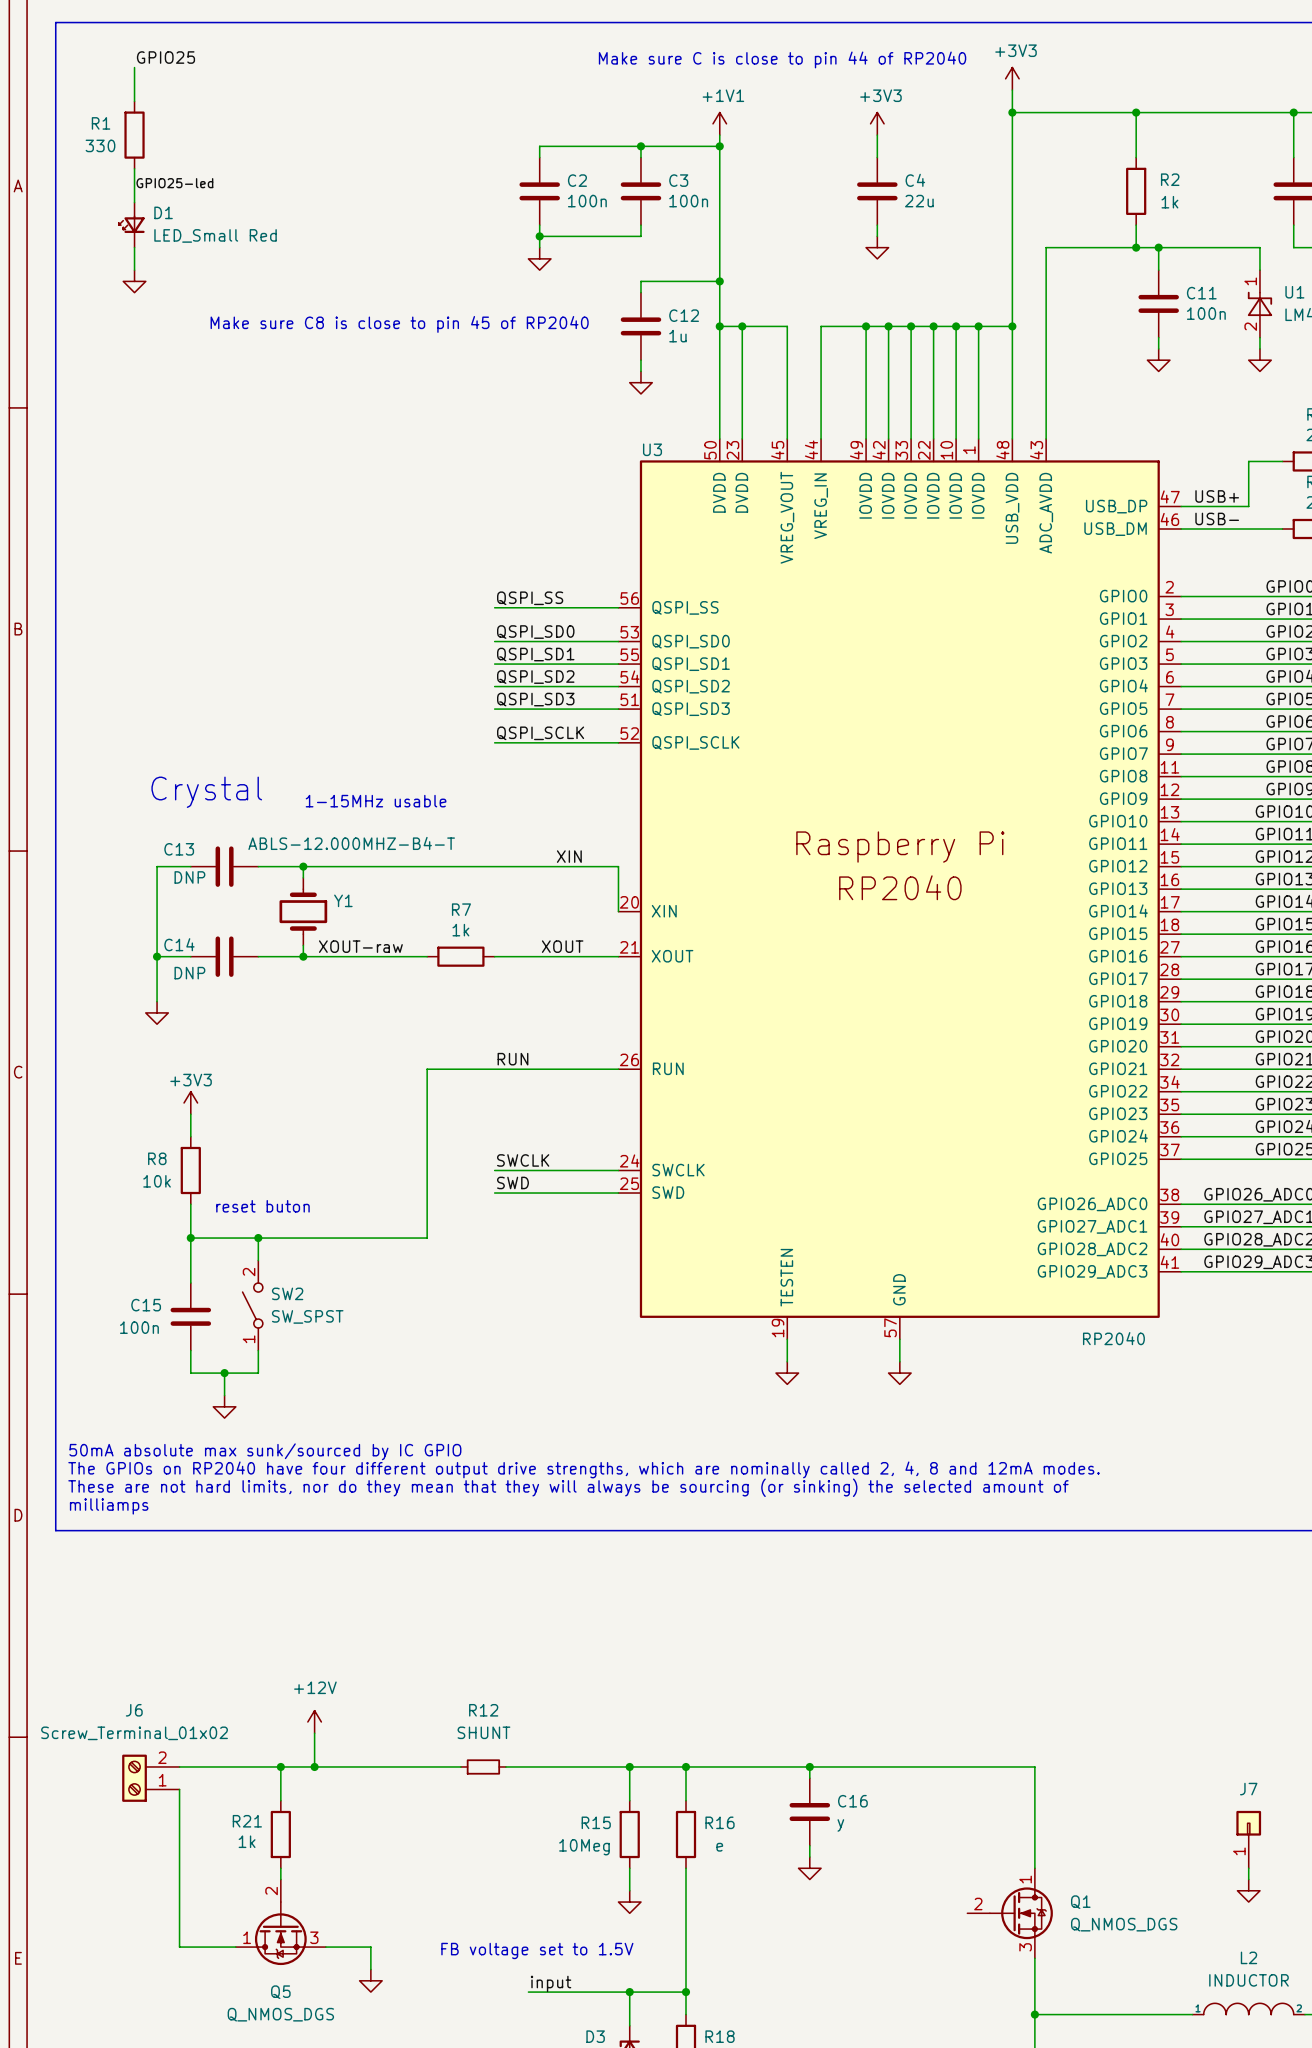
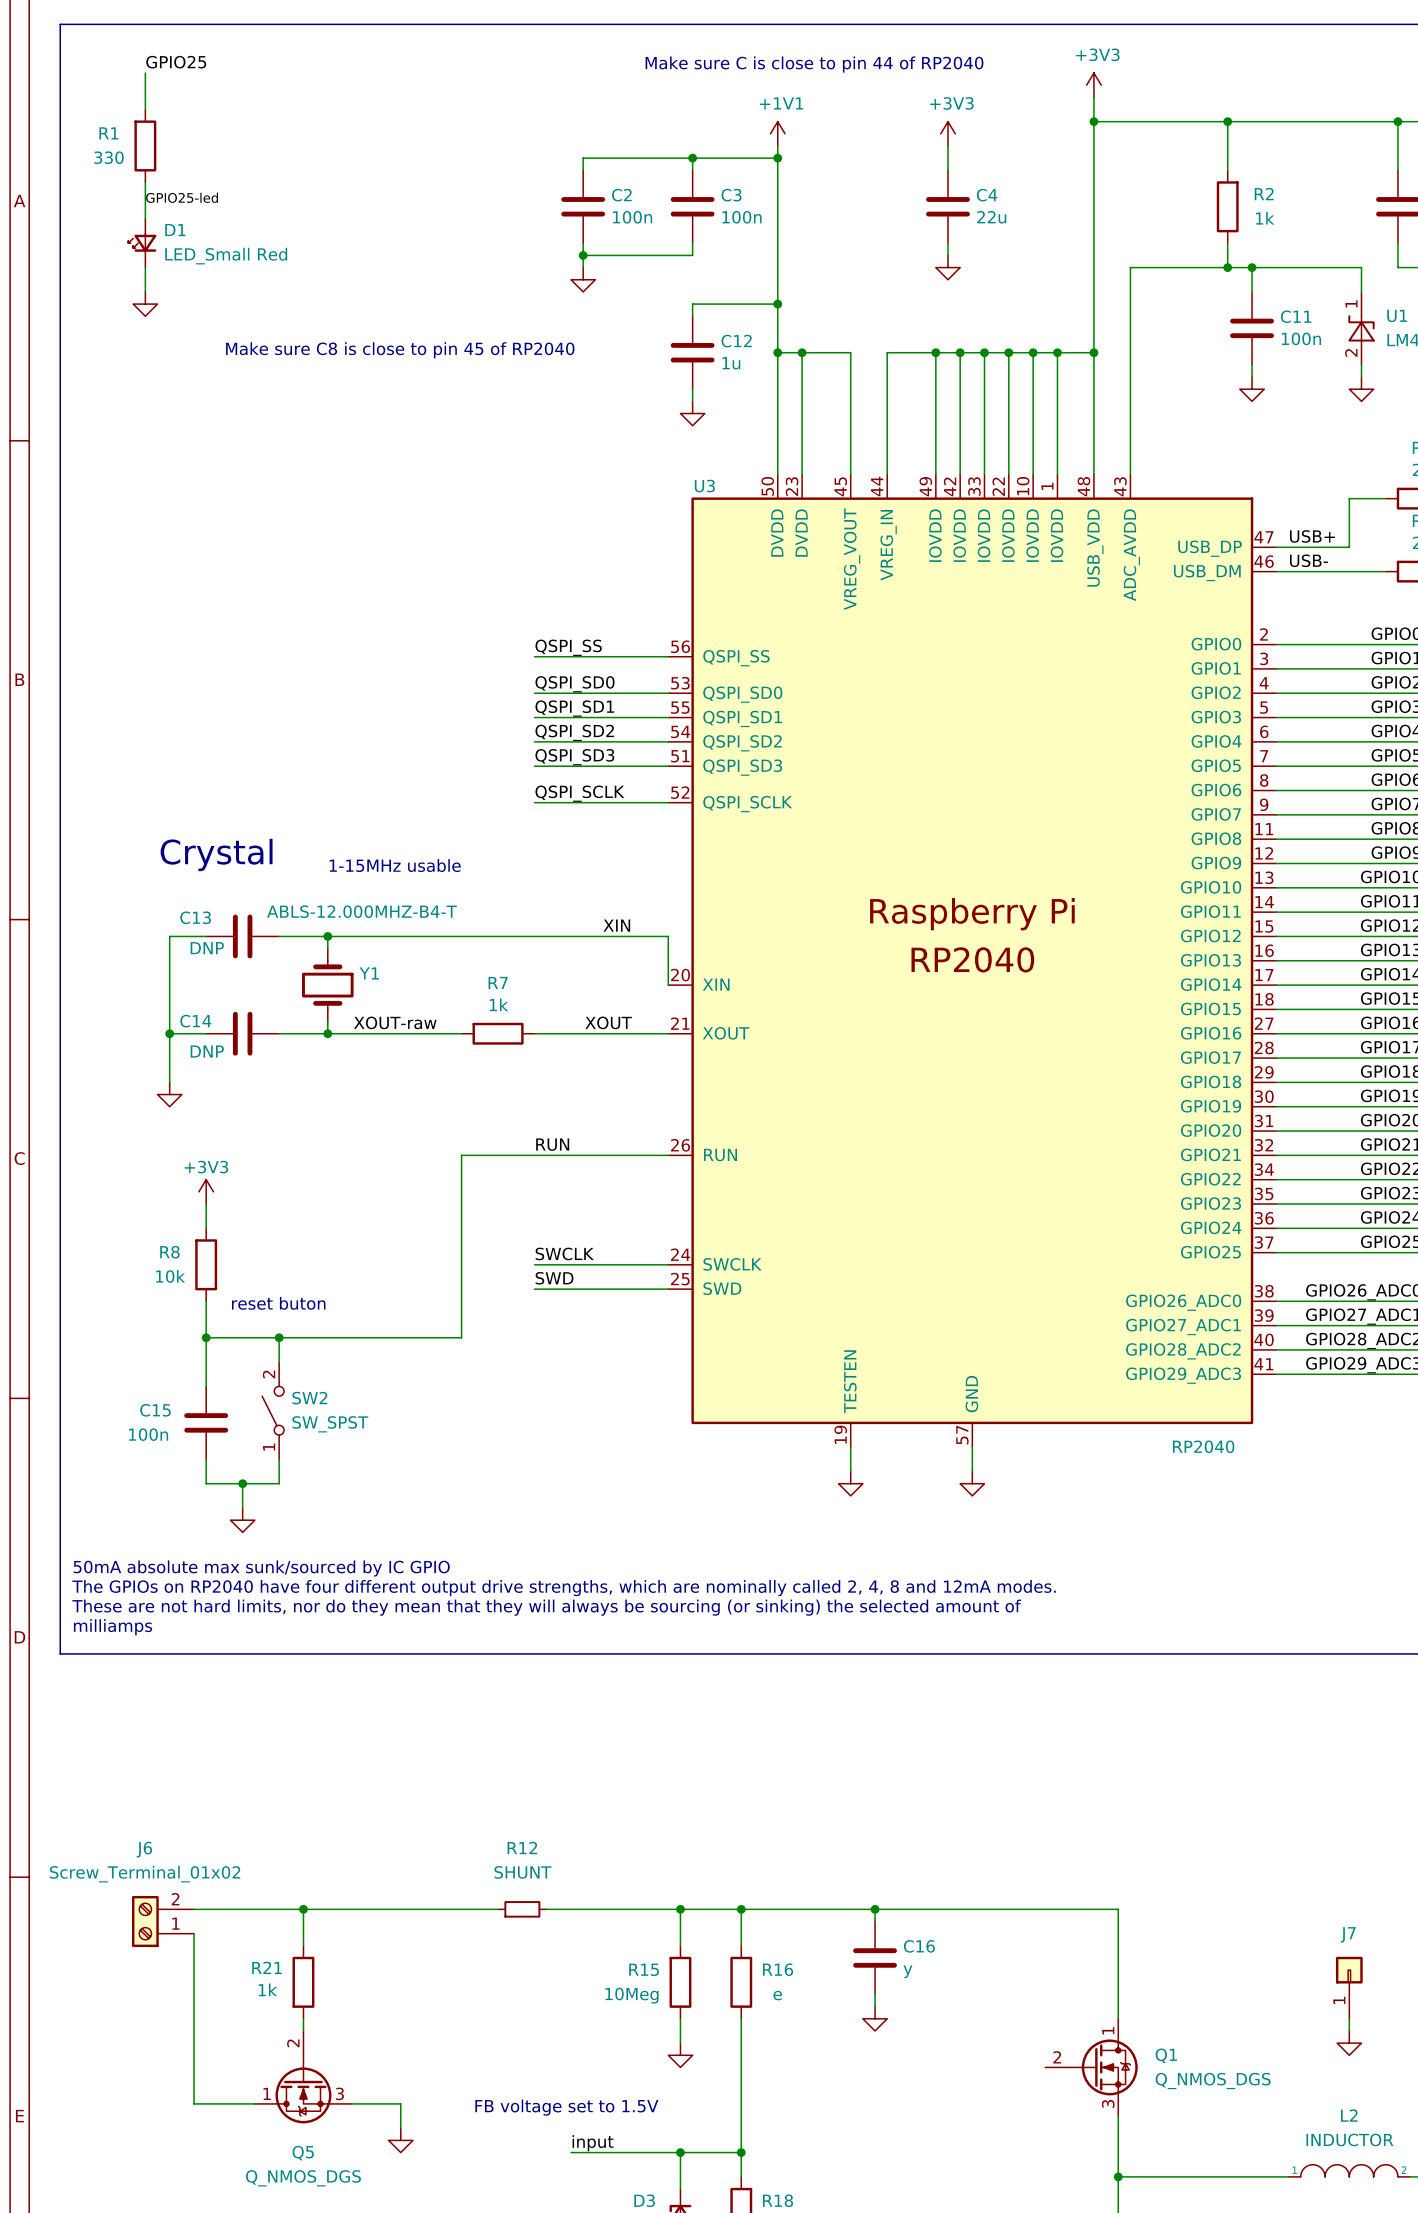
power symbol: +12V (314, 1721) -> none
wire: (314, 1733) (314, 1766) -> none
junction: (314, 1766) -> none

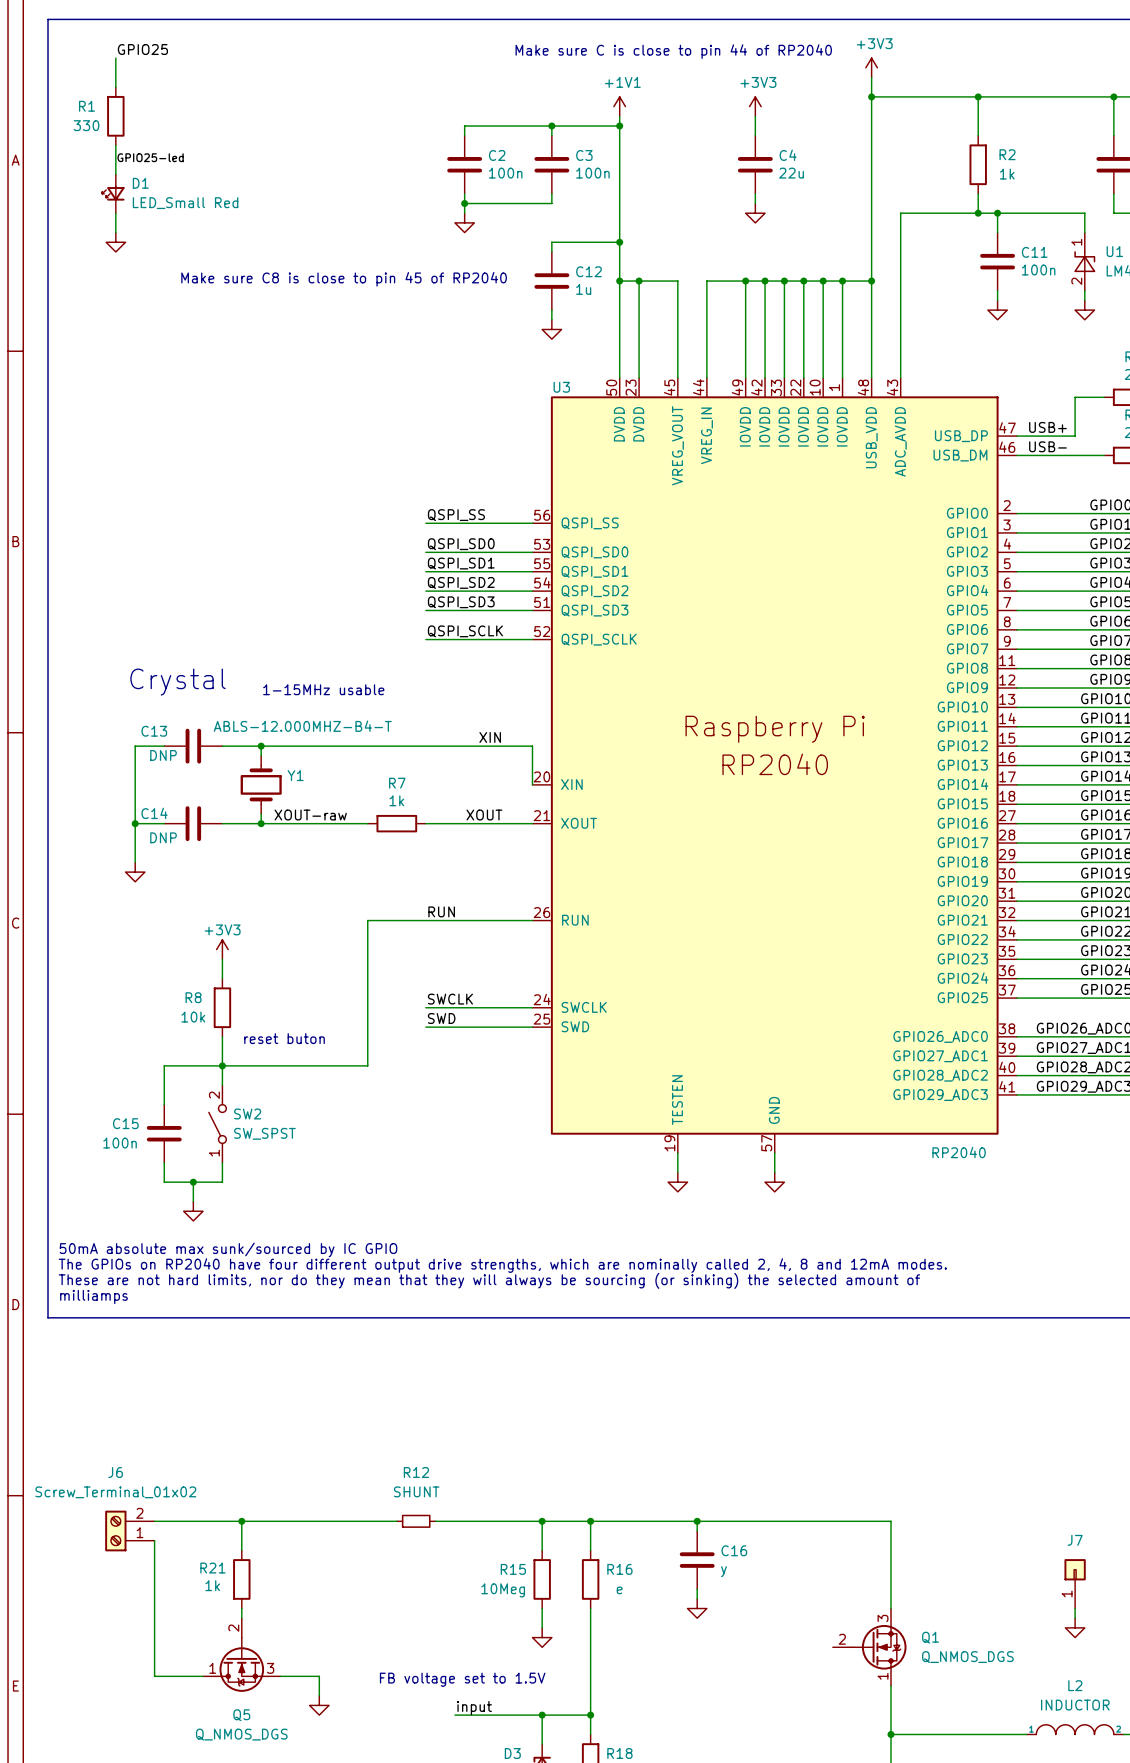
power symbol position: +3V3 (206, 1191) -> +3V3 (222, 949)
wire: (206, 1204) (206, 1228) -> (222, 959) (222, 978)
R8 position: (206, 1264) -> (222, 1007)
wire: (206, 1301) (206, 1337) -> (222, 1036) (222, 1065)
text position: reset buton (278, 1303) -> reset buton (284, 1038)
junction: (206, 1337) -> none
Q1 flip: as is (1103, 2067) -> up-down (879, 1647)

